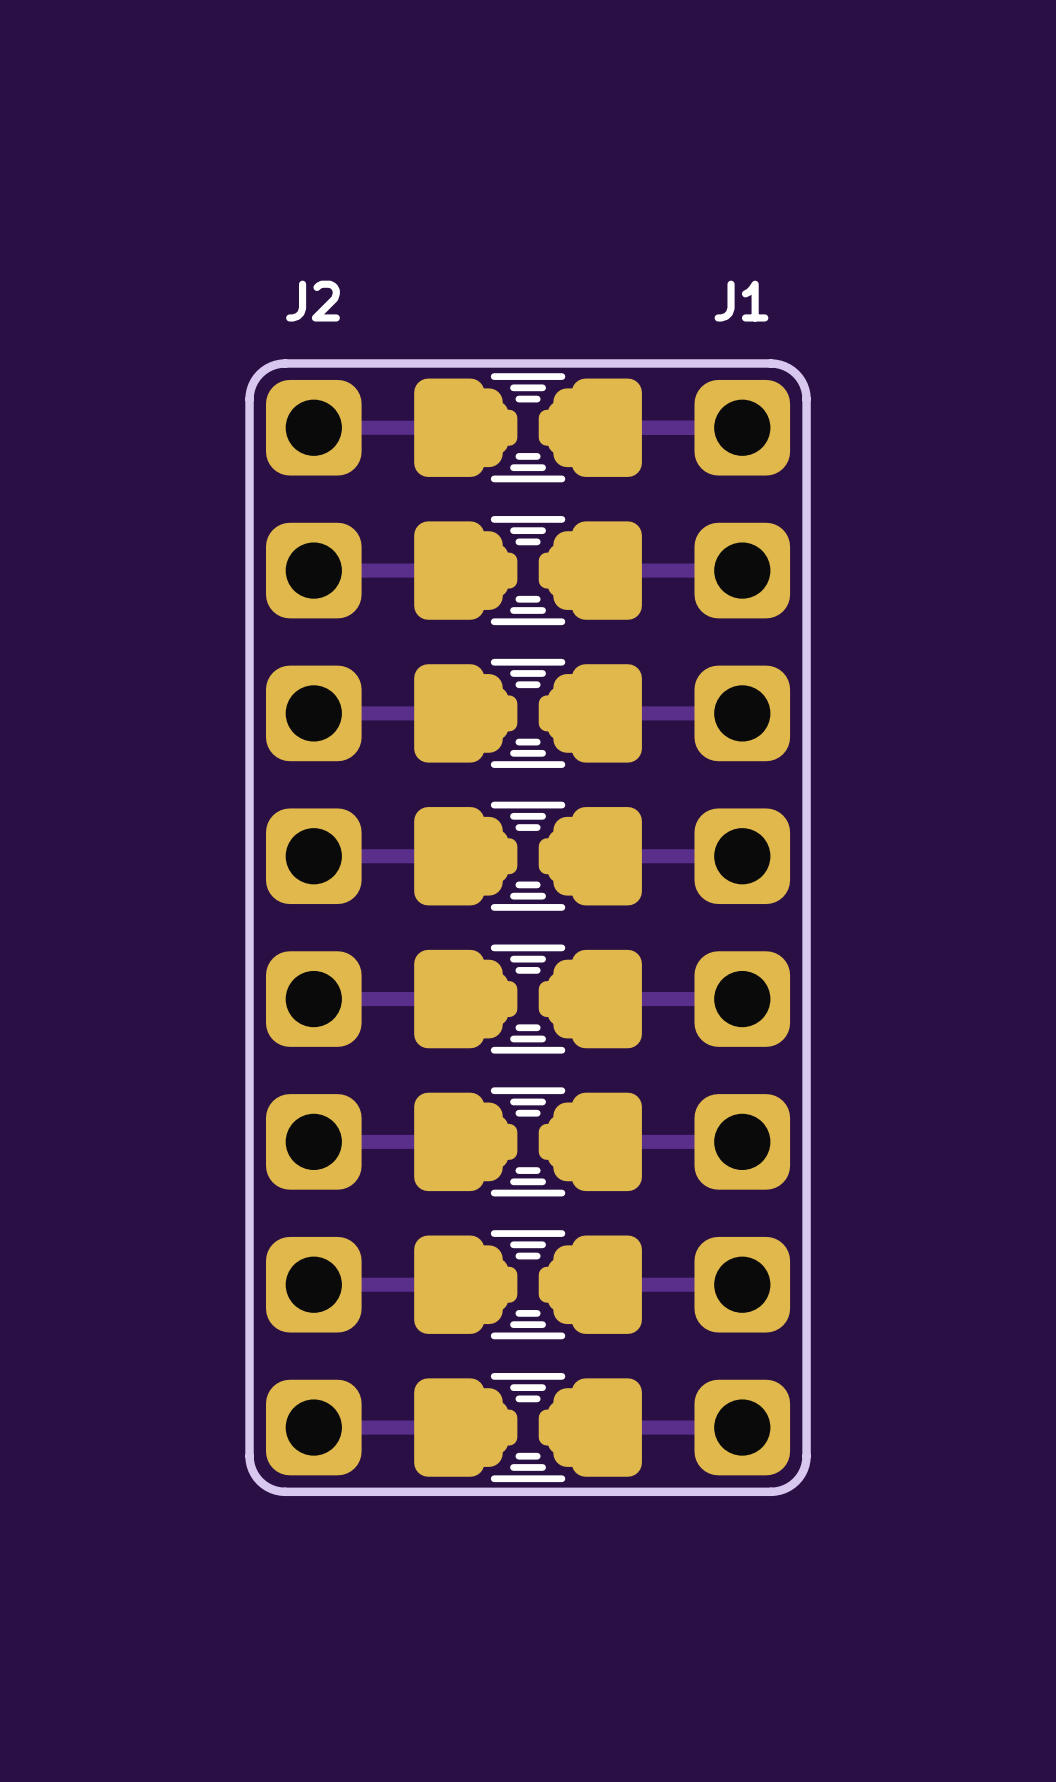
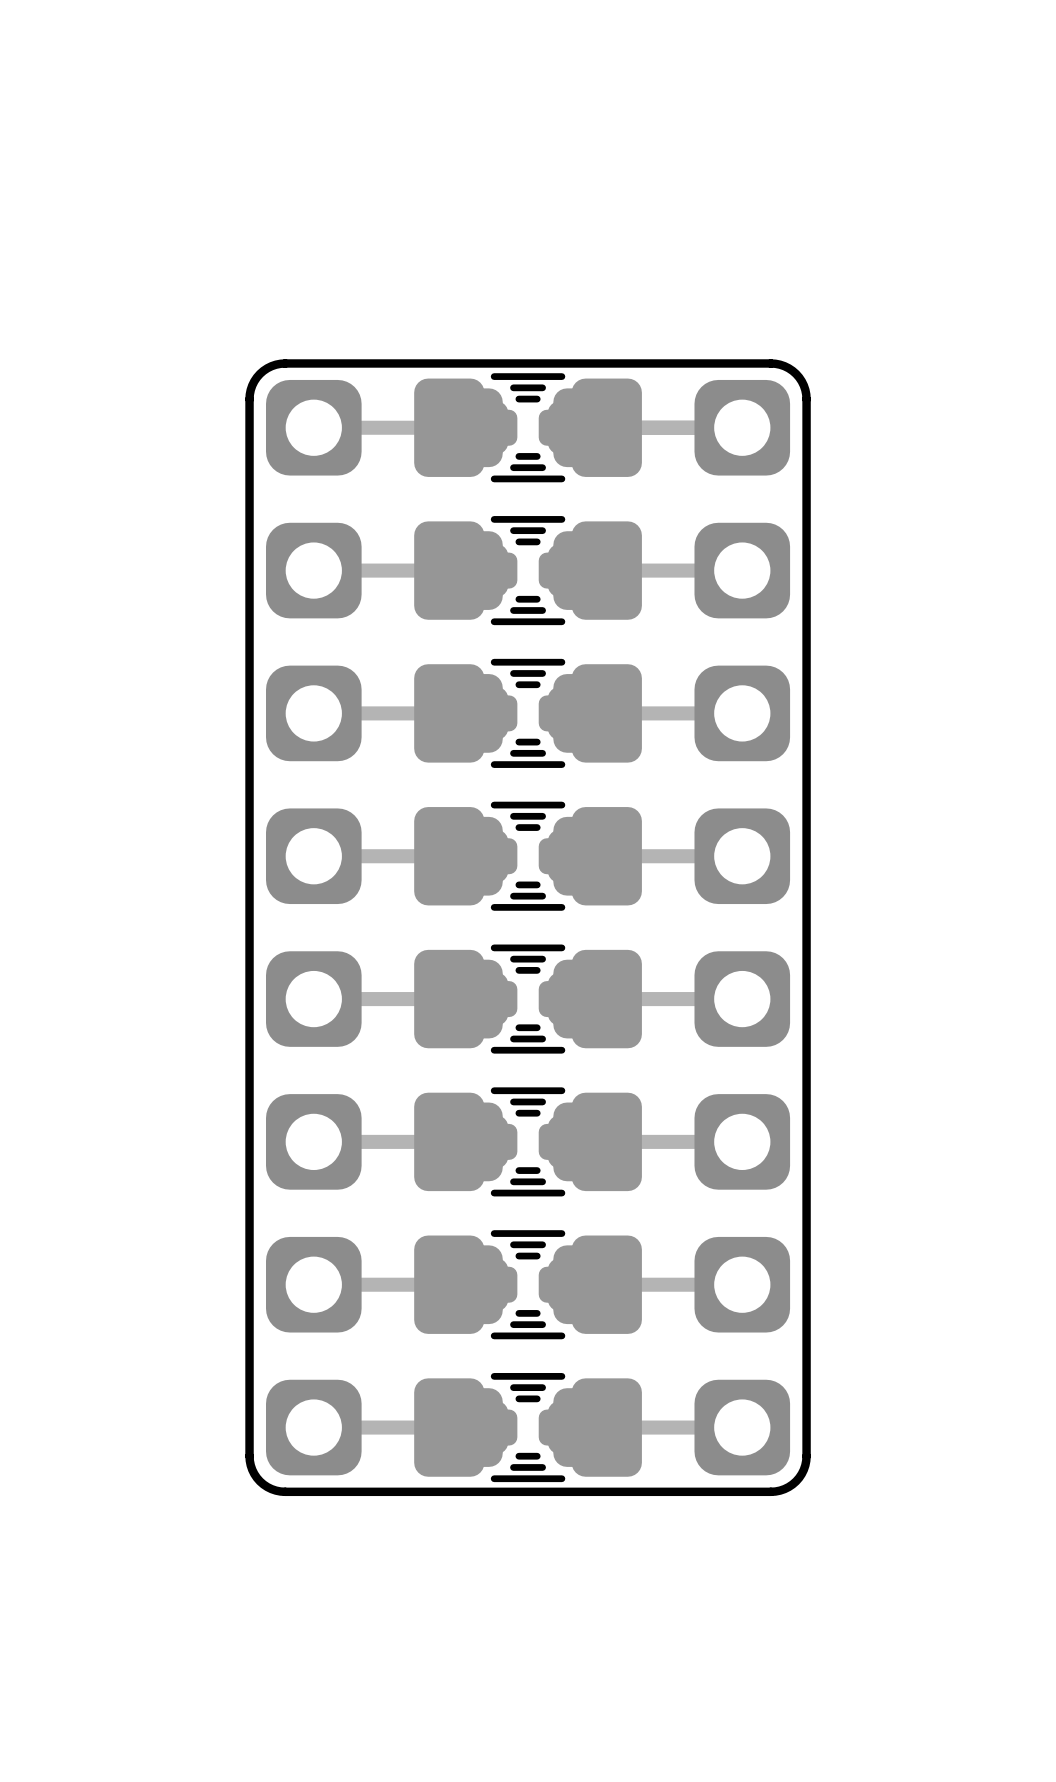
J2 name: J2 (313, 301) -> none
J1 name: J1 (741, 301) -> none

